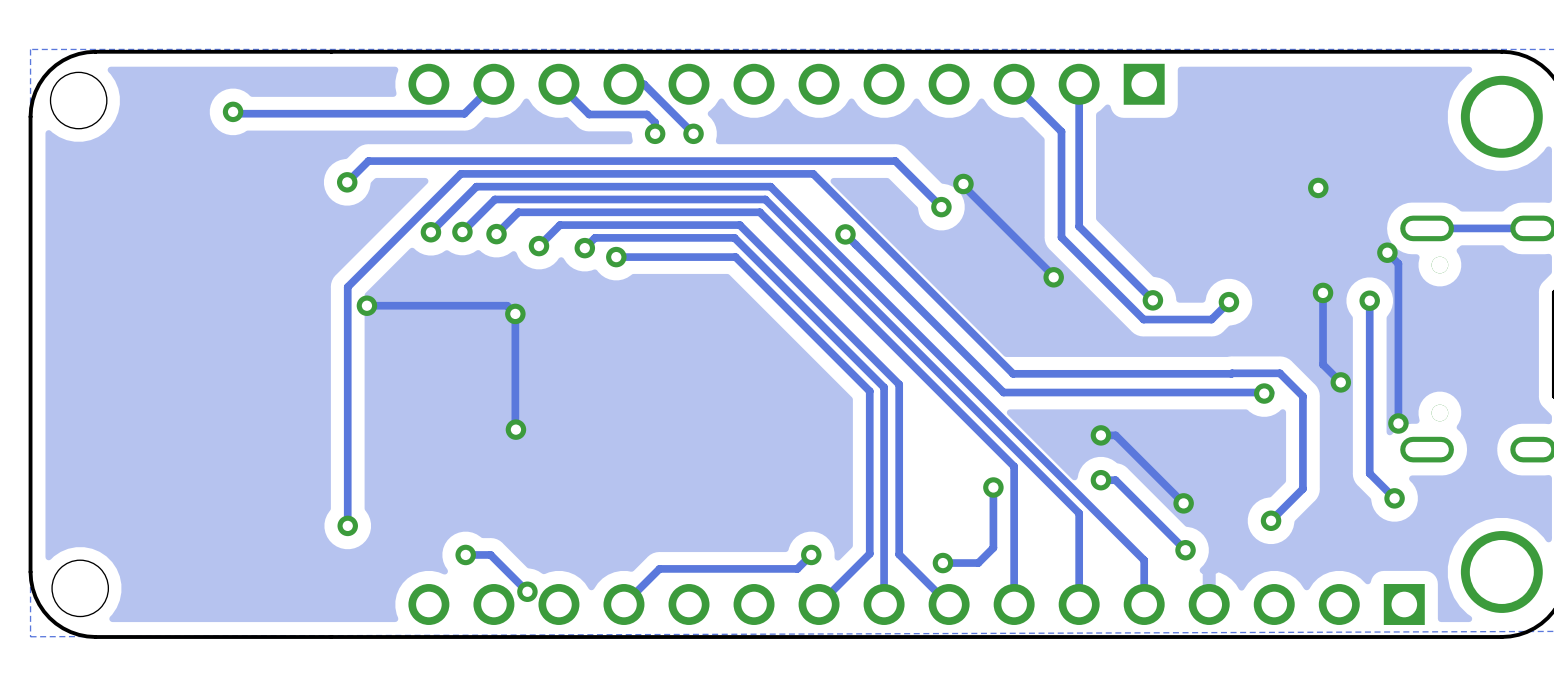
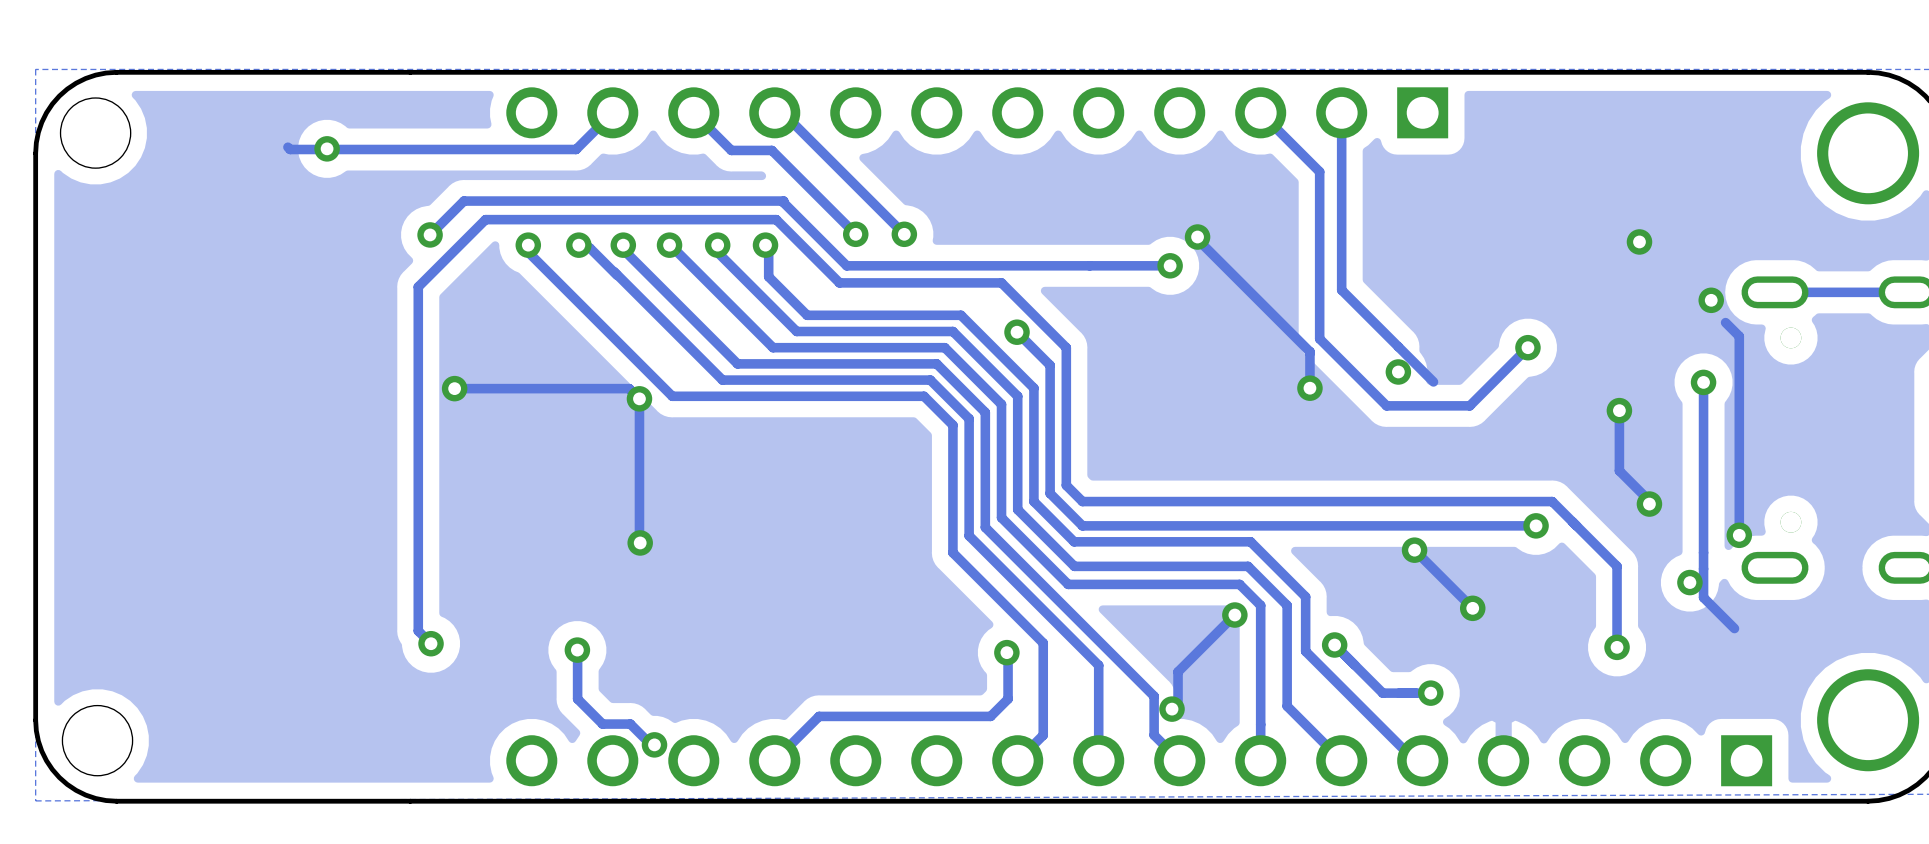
track: (630, 84) (644, 84) (693, 133) -> (782, 112) (904, 234)
via position: (233, 111) -> (327, 148)
track: (621, 114) (647, 114) (655, 122) (655, 133) -> (771, 150) (855, 234)
via: (655, 133) -> none
via: (693, 133) -> none
track: (368, 161) (895, 161) (941, 207) -> (456, 208) (463, 201) (783, 201) (846, 265) (1170, 265)
via: none -> (855, 234)
via: none -> (904, 234)
via: none -> (528, 245)
via: none -> (578, 245)
via: none -> (623, 245)
via: none -> (669, 245)
via: none -> (717, 245)
via: none -> (765, 245)
track: none -> (571, 248) (589, 248) (617, 275)
track: (430, 232) (476, 186) (770, 186) (1144, 560) (1144, 604) -> (768, 248) (768, 276) (807, 315) (961, 315) (1033, 388) (1033, 501) (1074, 541) (1250, 541) (1305, 596) (1305, 651) (1415, 760) (1422, 760)
via: (430, 232) -> none
track: (462, 232) (494, 199) (765, 199) (1079, 513) (1079, 604) -> (714, 248) (796, 331) (952, 331) (1017, 396) (1017, 509) (1074, 566) (1248, 566) (1287, 605) (1287, 706) (1341, 760)
via: (462, 232) -> none
track: (496, 234) (518, 212) (759, 212) (1014, 466) (1014, 479) -> (673, 248) (773, 347) (944, 347) (1001, 404) (1001, 517) (1068, 584) (1239, 584) (1260, 605)
via: (496, 234) -> none
track: (845, 234) (1003, 392) (1270, 392) -> none
via position: (845, 234) -> (1017, 332)
track: (1061, 237) (1143, 319) -> (1319, 303) (1319, 338) (1386, 405) (1422, 405)
track: (538, 246) (559, 225) (739, 225) (899, 384) (899, 554) (928, 583) -> (622, 249) (737, 363) (936, 363) (985, 412) (985, 527) (1154, 696) (1154, 735)
via: (538, 246) -> none
track: (584, 248) (595, 237) (734, 237) (884, 387) (884, 527) -> (614, 271) (722, 380) (930, 380) (969, 418) (969, 535) (1098, 665)
via: (584, 248) -> none
via position: (1387, 252) -> (1711, 300)
track: (616, 257) (735, 257) (869, 391) (869, 553) (839, 584) -> (528, 247) (528, 252) (672, 396) (924, 396) (952, 425) (952, 552) (1043, 643) (1043, 735)
via: (616, 257) -> none
track: none -> (1018, 331) (1017, 332) (1050, 365) (1050, 493) (1082, 525) (1536, 525)
track: none -> (1309, 353) (1309, 388)
via position: (1053, 277) -> (1309, 388)
track: (1323, 292) (1323, 364) (1340, 382) -> none
via: (1323, 292) -> none
via position: (1152, 300) -> (1398, 371)
track: (1228, 302) (1211, 319) (1182, 319) -> (1527, 347) (1469, 405)
via position: (1228, 302) -> (1527, 347)
track: none -> (1619, 410) (1619, 470) (1652, 504)
via: none -> (1619, 410)
via position: (1340, 382) -> (1649, 504)
via: (1264, 393) -> none
via: none -> (1536, 525)
track: (1100, 435) (1115, 435) (1183, 503) -> none
via: (1100, 435) -> none
track: none -> (1414, 550) (1472, 608)
via: none -> (1414, 550)
via: none -> (1689, 582)
track: (1100, 480) (1115, 480) (1185, 550) -> none
via: (1100, 480) -> none
track: (993, 487) (993, 547) (978, 563) (942, 563) -> (1234, 615) (1178, 671) (1178, 706)
via: (1394, 498) -> none
via position: (1183, 503) -> (1472, 608)
track: none -> (431, 643) (418, 630) (418, 286) (485, 219) (776, 219) (839, 282) (1001, 282) (1066, 347) (1066, 485) (1082, 501) (1552, 501) (1617, 566) (1617, 647)
track: none -> (1334, 644) (1382, 693) (1430, 693)
via: none -> (1334, 644)
track: none -> (1006, 652) (1008, 699)
track: (1271, 520) (1302, 488) (1302, 396) (1279, 373) (1013, 373) (813, 173) (460, 173) (347, 287) (347, 525) -> none
via position: (1271, 520) -> (1617, 647)
via position: (347, 525) -> (431, 643)
via: none -> (1430, 693)
via: (1185, 550) -> none
track: (465, 554) (490, 554) (527, 591) -> (577, 650) (577, 699) (602, 724) (630, 724) (649, 744) (654, 744)
via position: (465, 554) -> (577, 650)
via position: (811, 554) -> (1006, 652)

